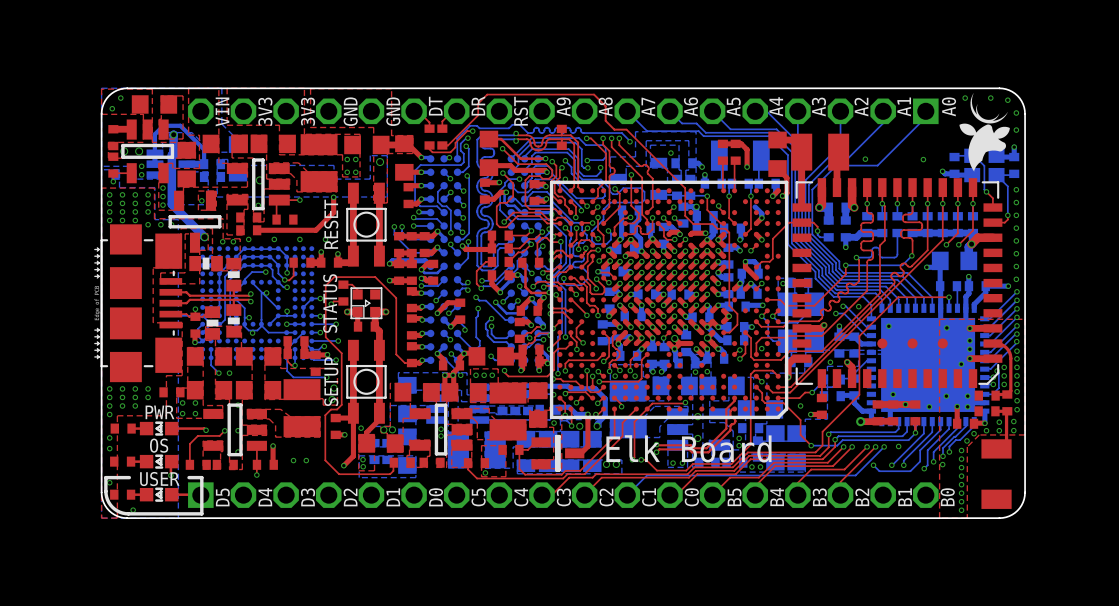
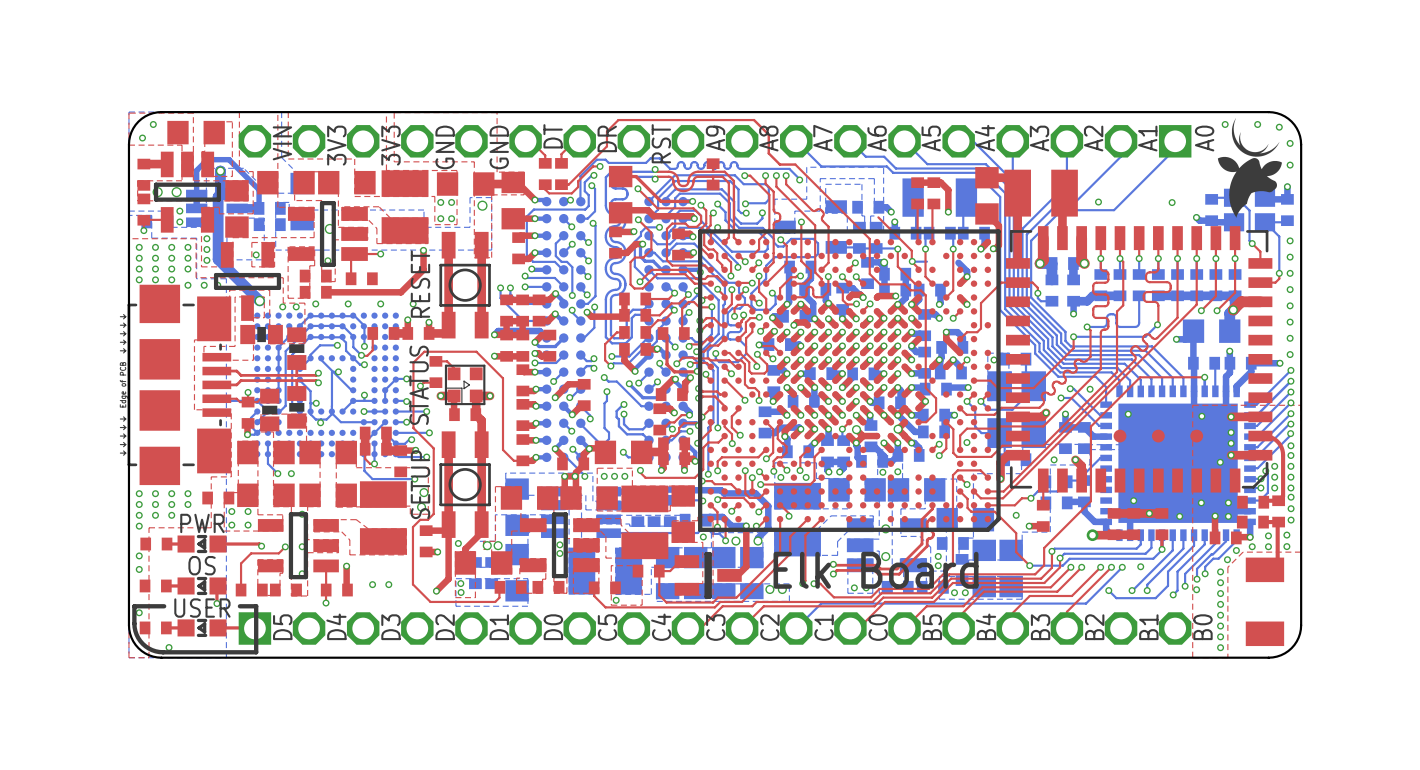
via: (670, 153) -> none
top track: (718, 205) (723, 212) -> (878, 217) (911, 250) (911, 261) (918, 269)
bottom track: none -> (911, 261) (926, 261)
top track: (685, 402) (652, 403) (647, 408) -> none
via: (685, 402) -> none

